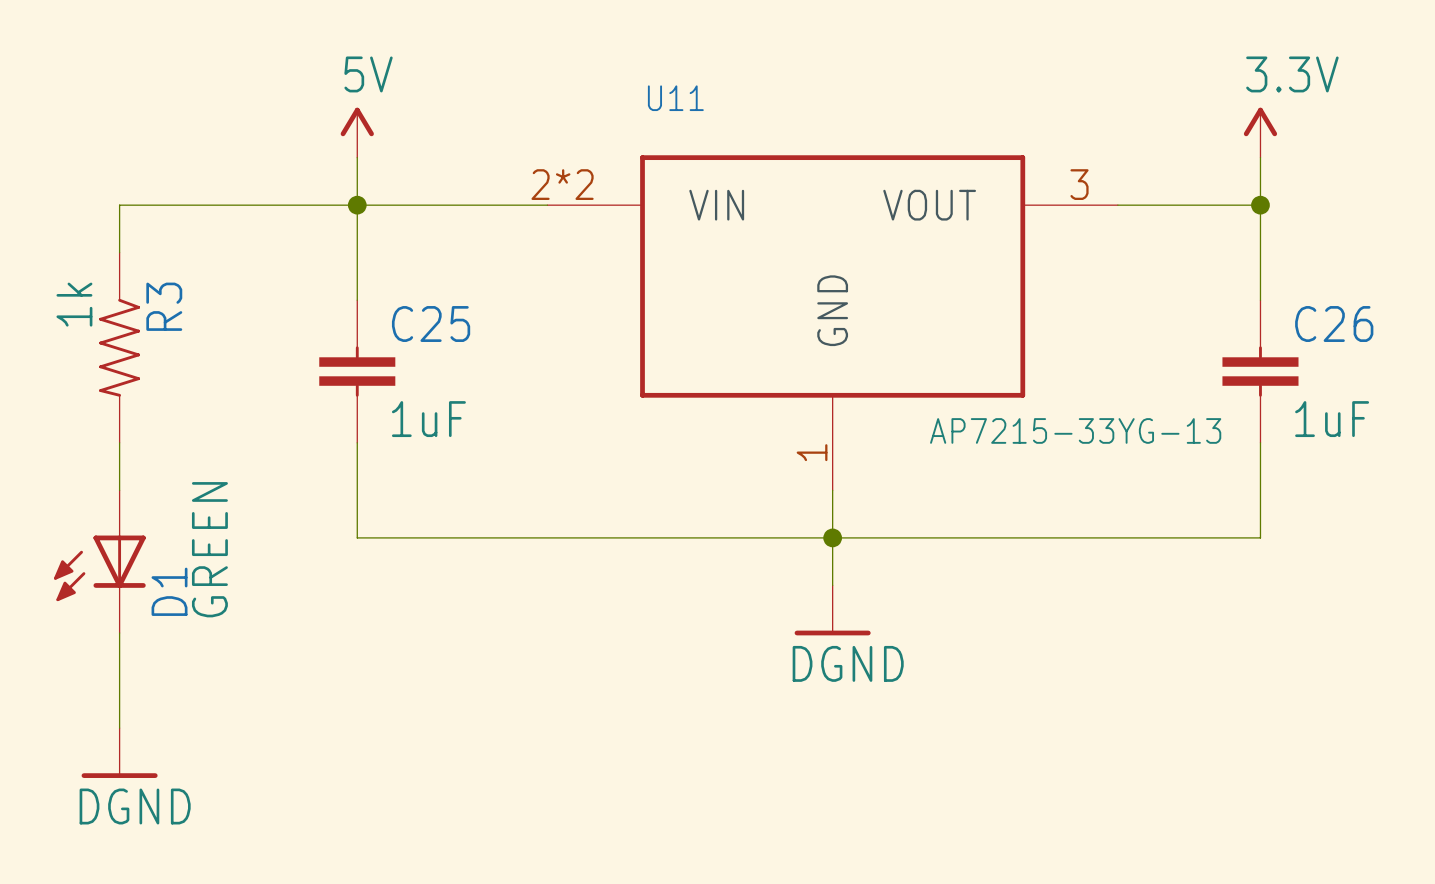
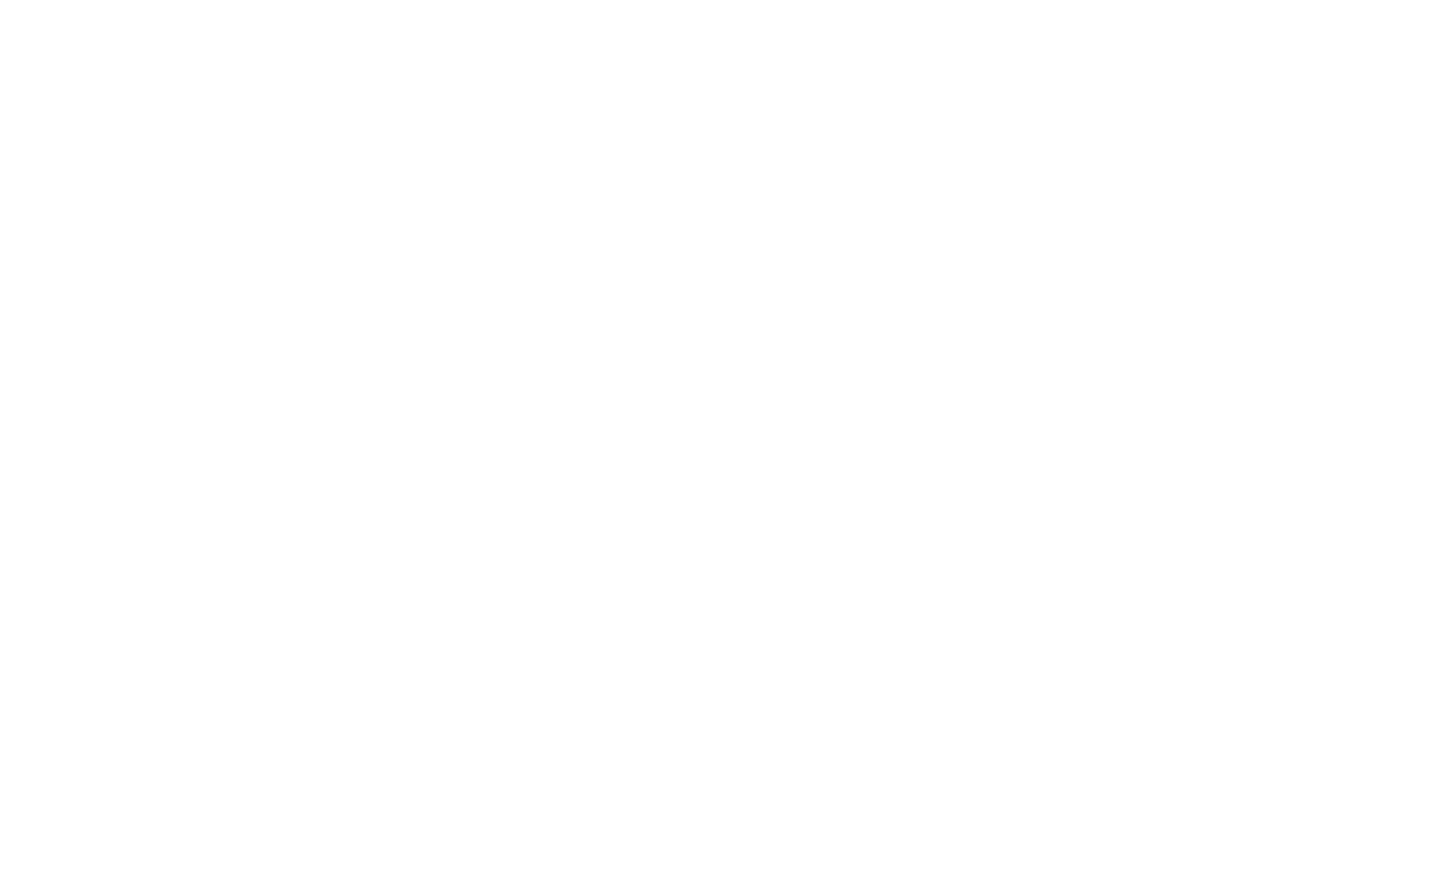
power symbol: 5V (357, 132) -> none
power symbol: 3.3V (1260, 132) -> none
wire: (357, 157) (357, 300) -> none
wire: (1260, 157) (1260, 300) -> none
junction: (357, 205) -> none
wire: (547, 205) (119, 205) (119, 252) -> none
wire: (1117, 205) (1260, 205) -> none
junction: (1260, 205) -> none
U11: AP7215-33YG-13 (832, 322) -> none
R3: 1k (119, 347) -> none
C25: 1uF (357, 371) -> none
C26: 1uF (1260, 371) -> none
wire: (119, 442) (119, 490) -> none
wire: (357, 442) (357, 537) (1260, 537) (1260, 442) -> none
wire: (832, 490) (832, 585) -> none
junction: (832, 537) -> none
D1: GREEN (99, 561) -> none
power symbol: DGND (832, 610) -> none
wire: (119, 632) (119, 728) -> none
power symbol: DGND (119, 753) -> none

